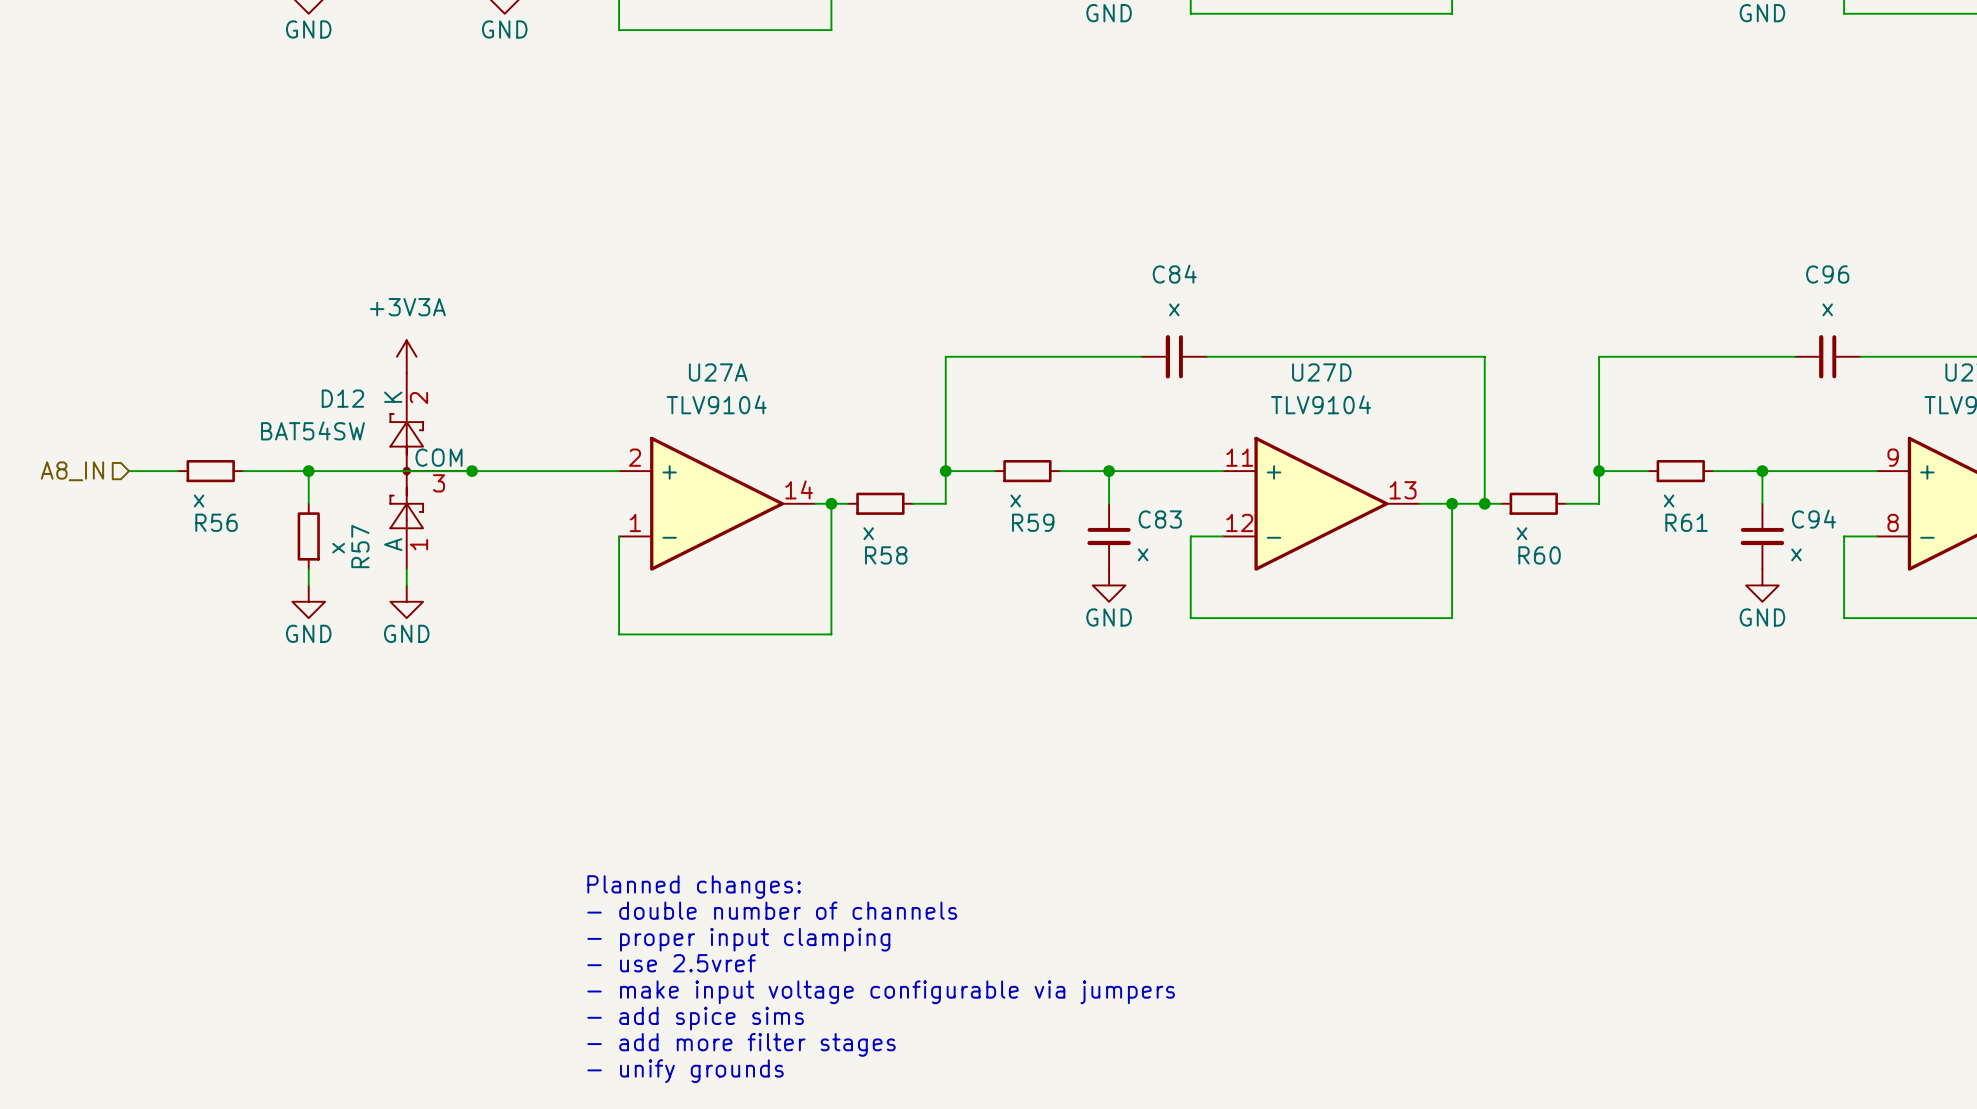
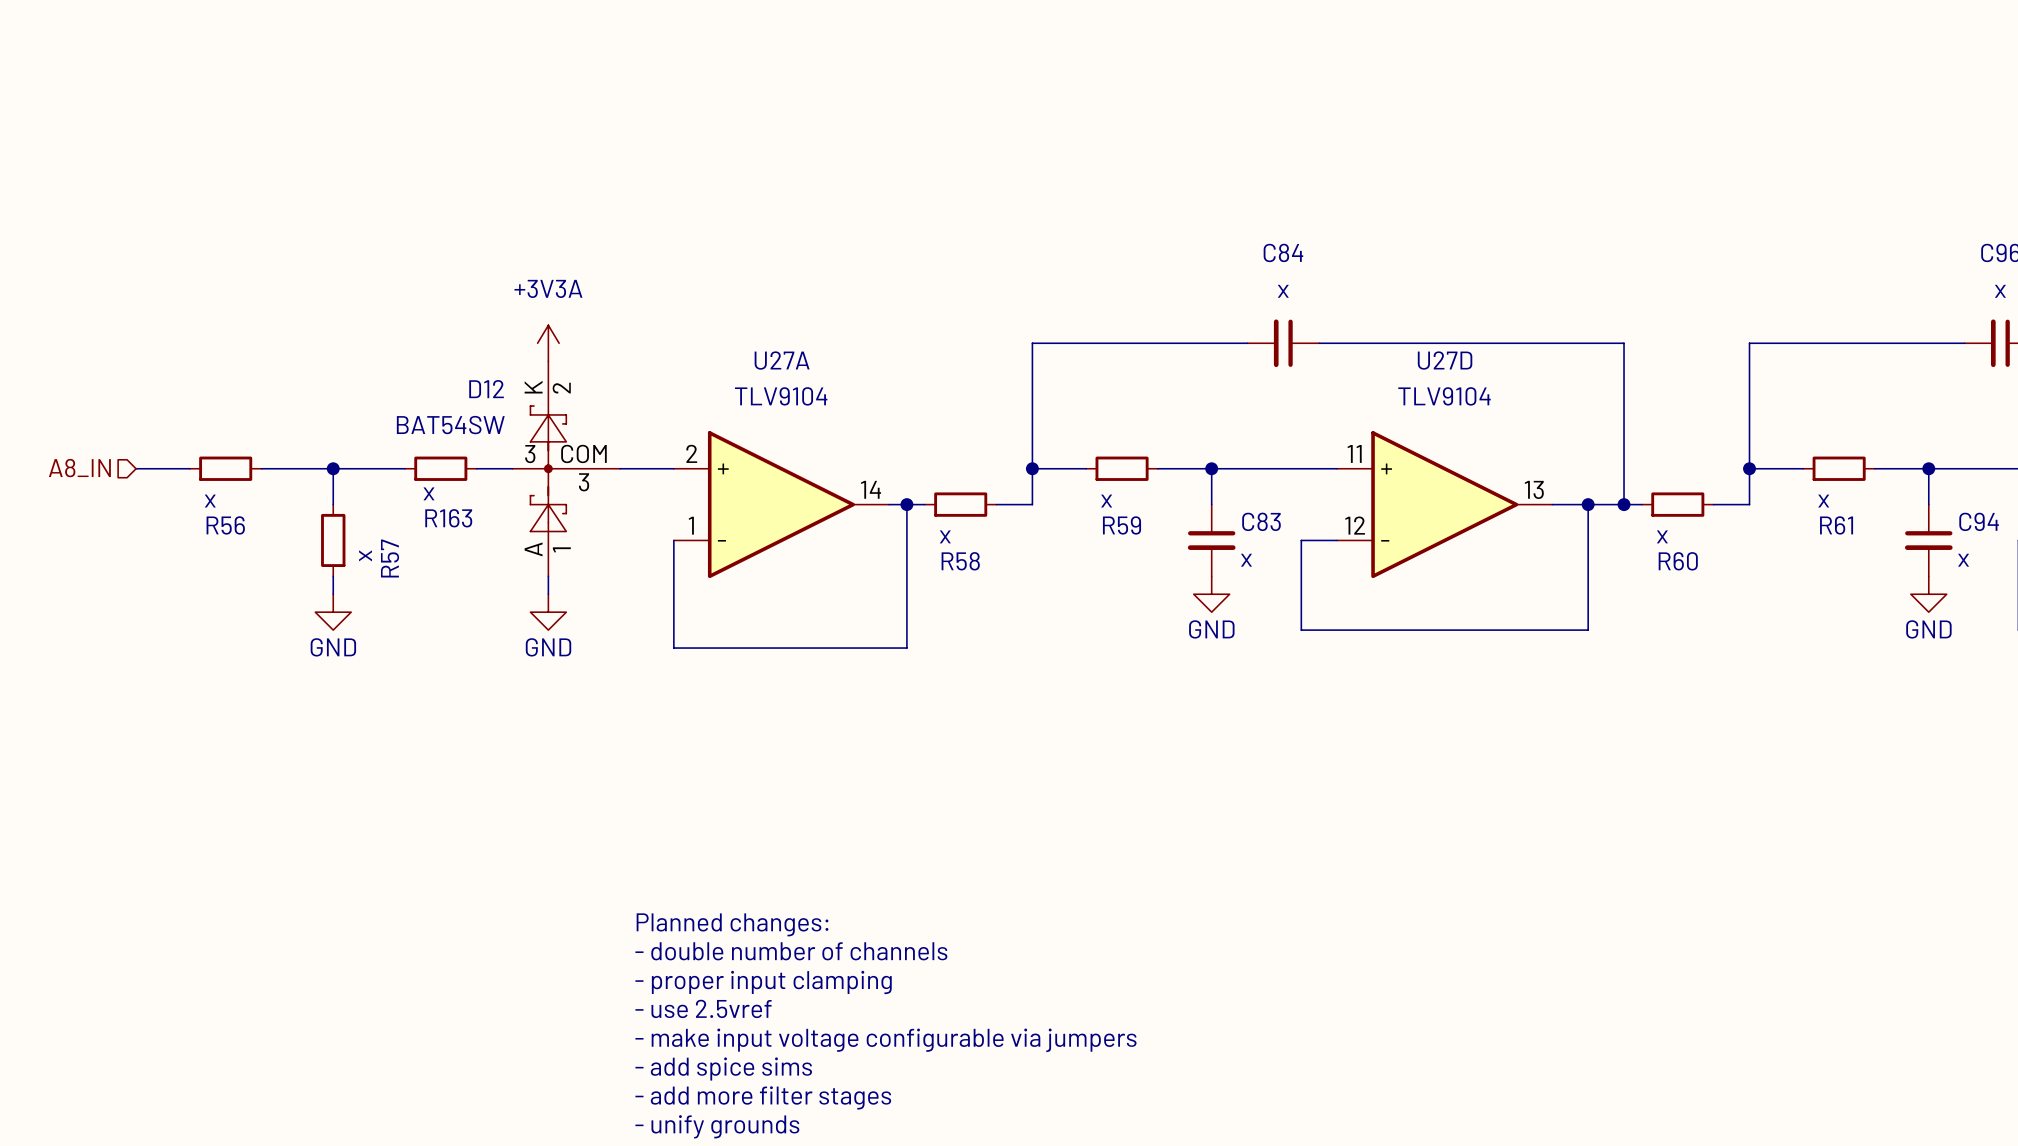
power symbol position: +3V3A (406, 356) -> +3V3A (548, 343)
D12 symbol: [390, 373, 473, 570] -> [512, 361, 621, 577]
wire: (374, 471) (439, 471) -> none
R163: none -> x (440, 468)
junction: (472, 471) -> none
wire: (406, 569) (406, 585) -> (548, 576) (548, 594)
power symbol position: GND (406, 601) -> GND (548, 612)

